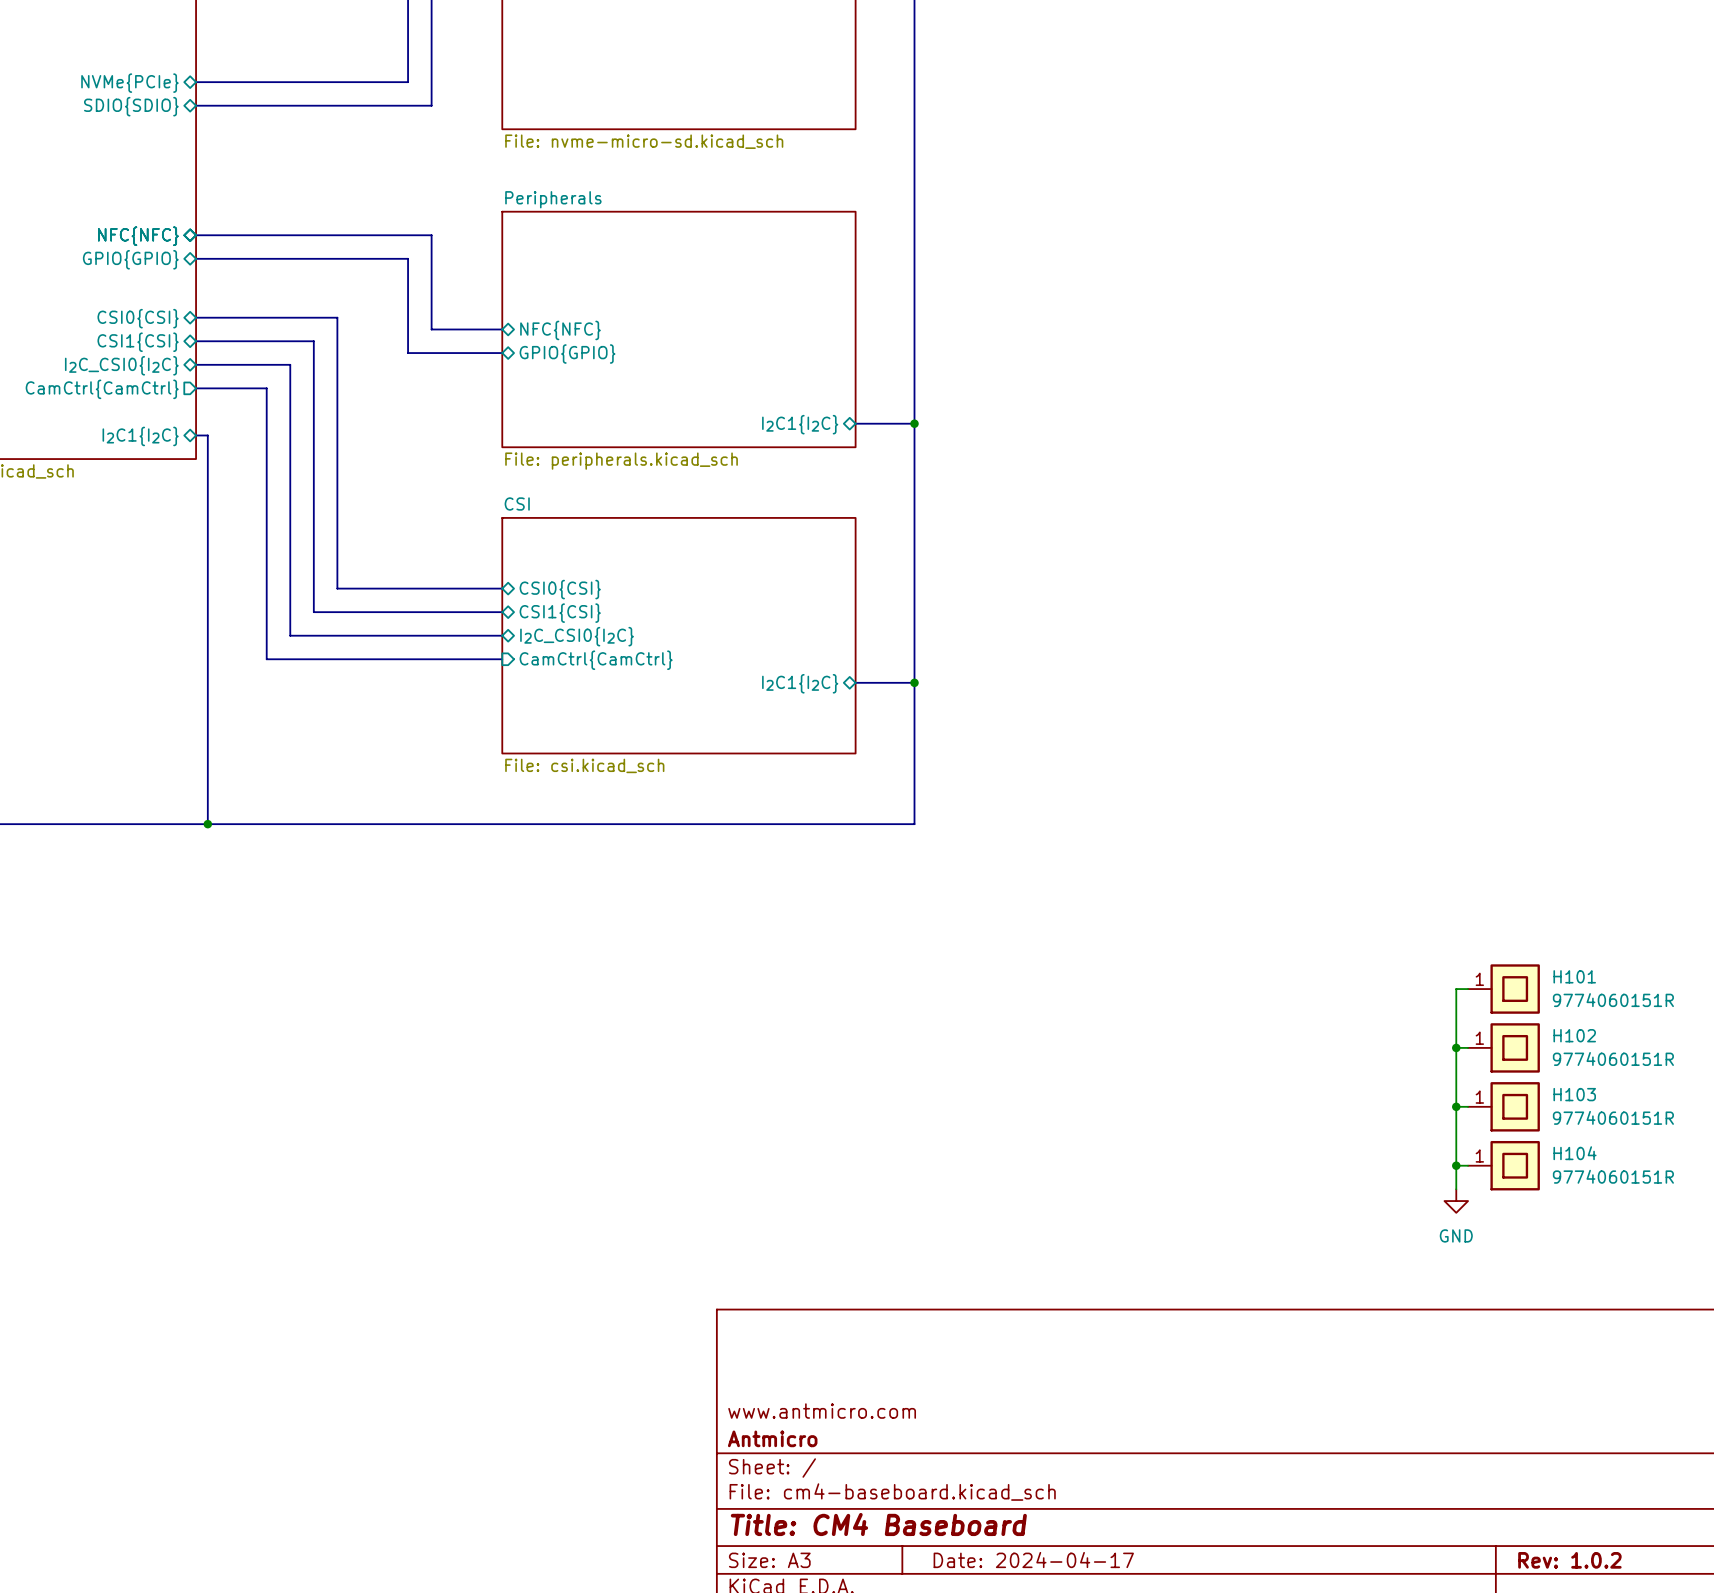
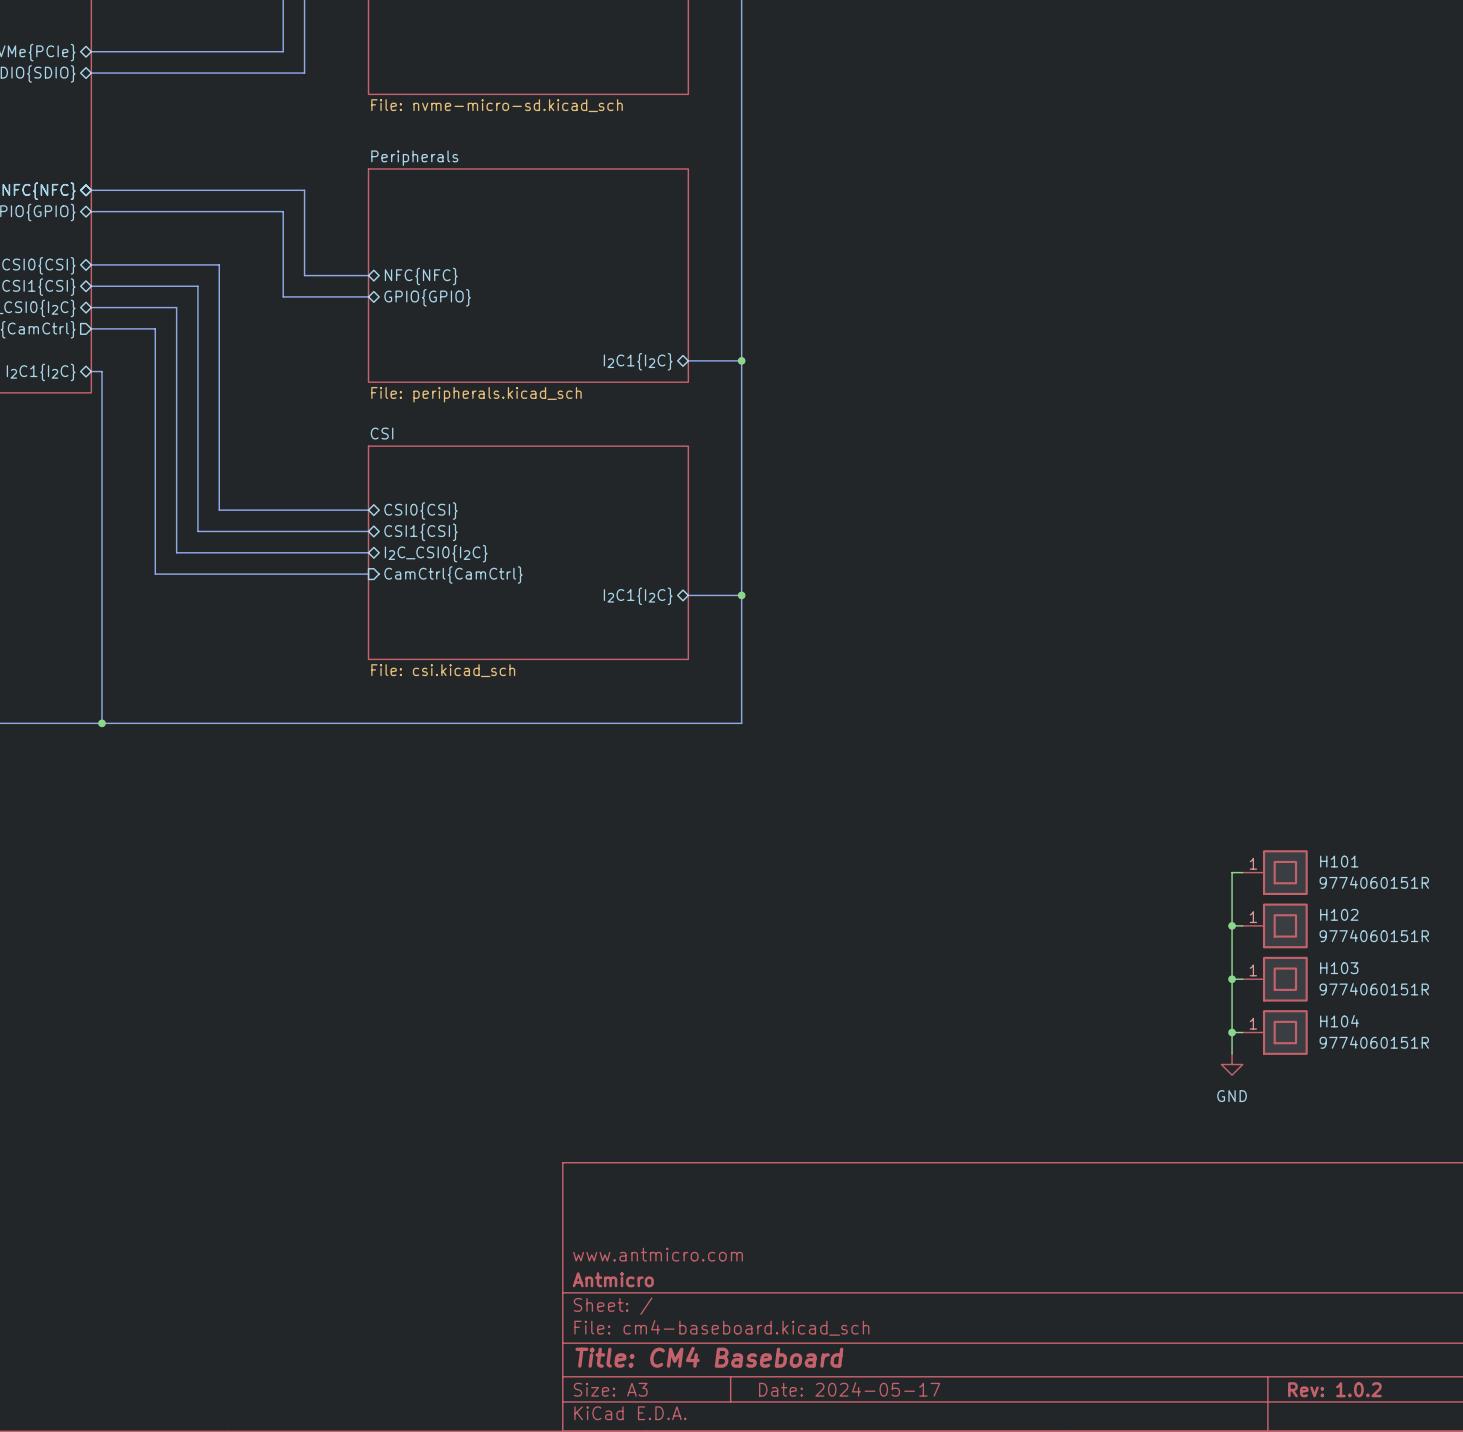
title block: Date: 2024-04-17 (1033, 1560) -> Date: 2024-05-17 (849, 1389)

